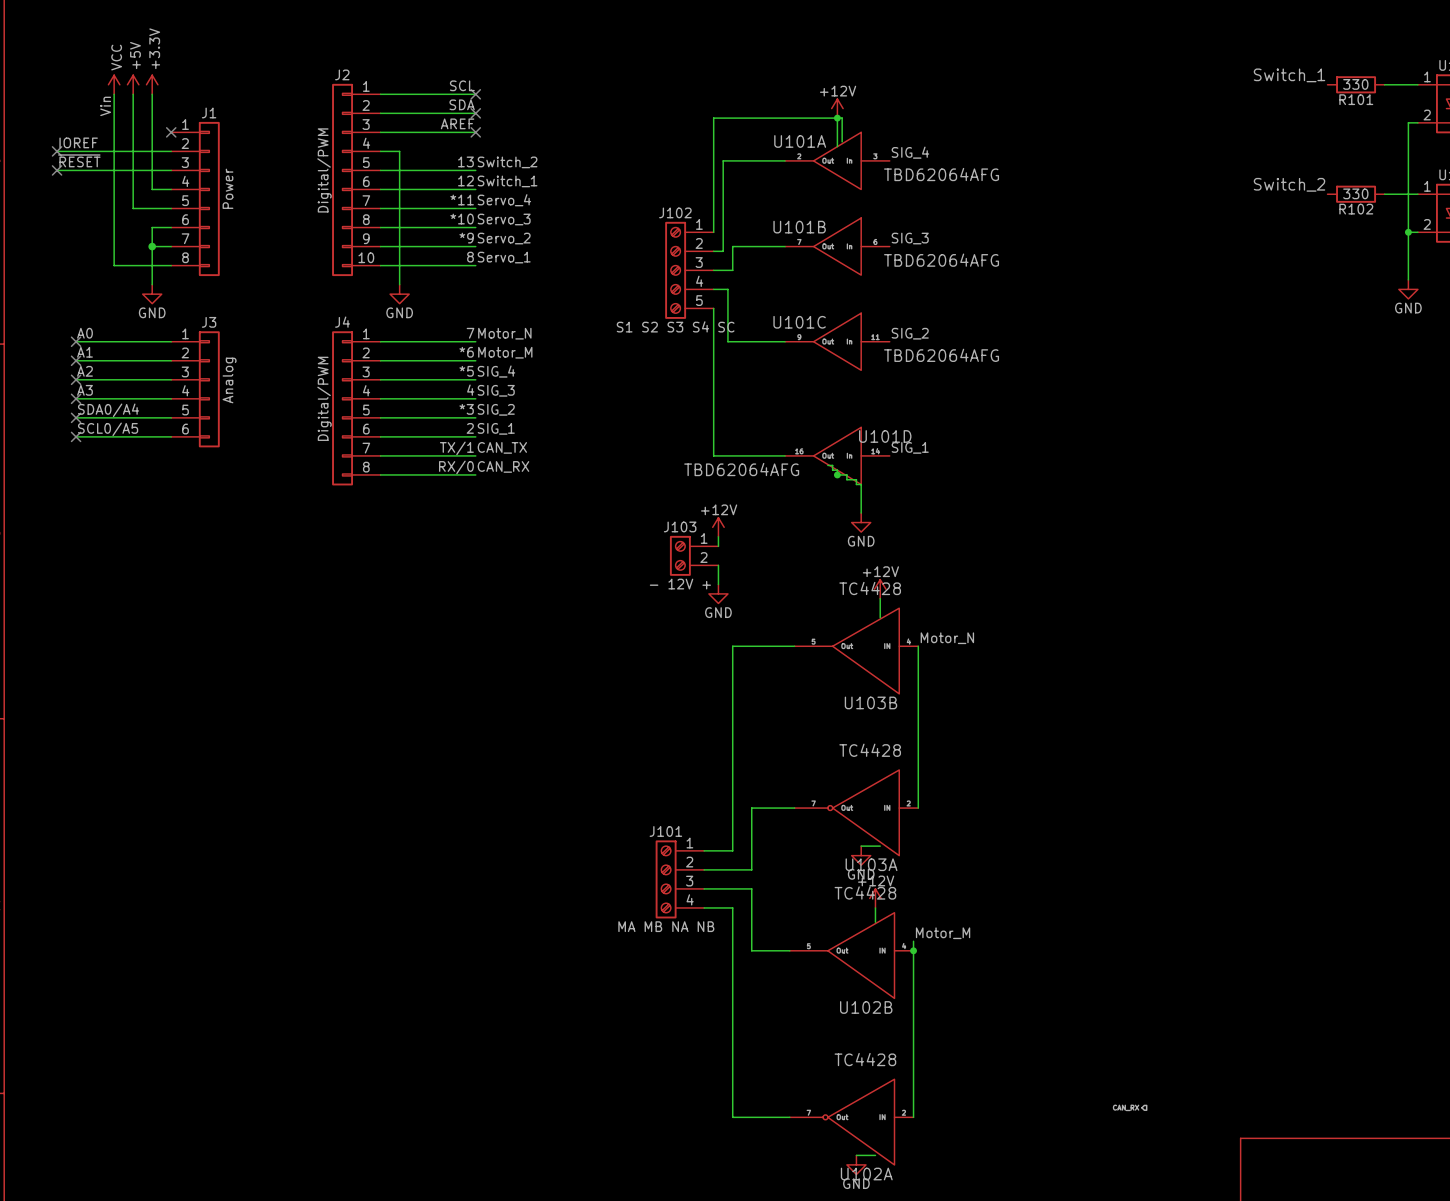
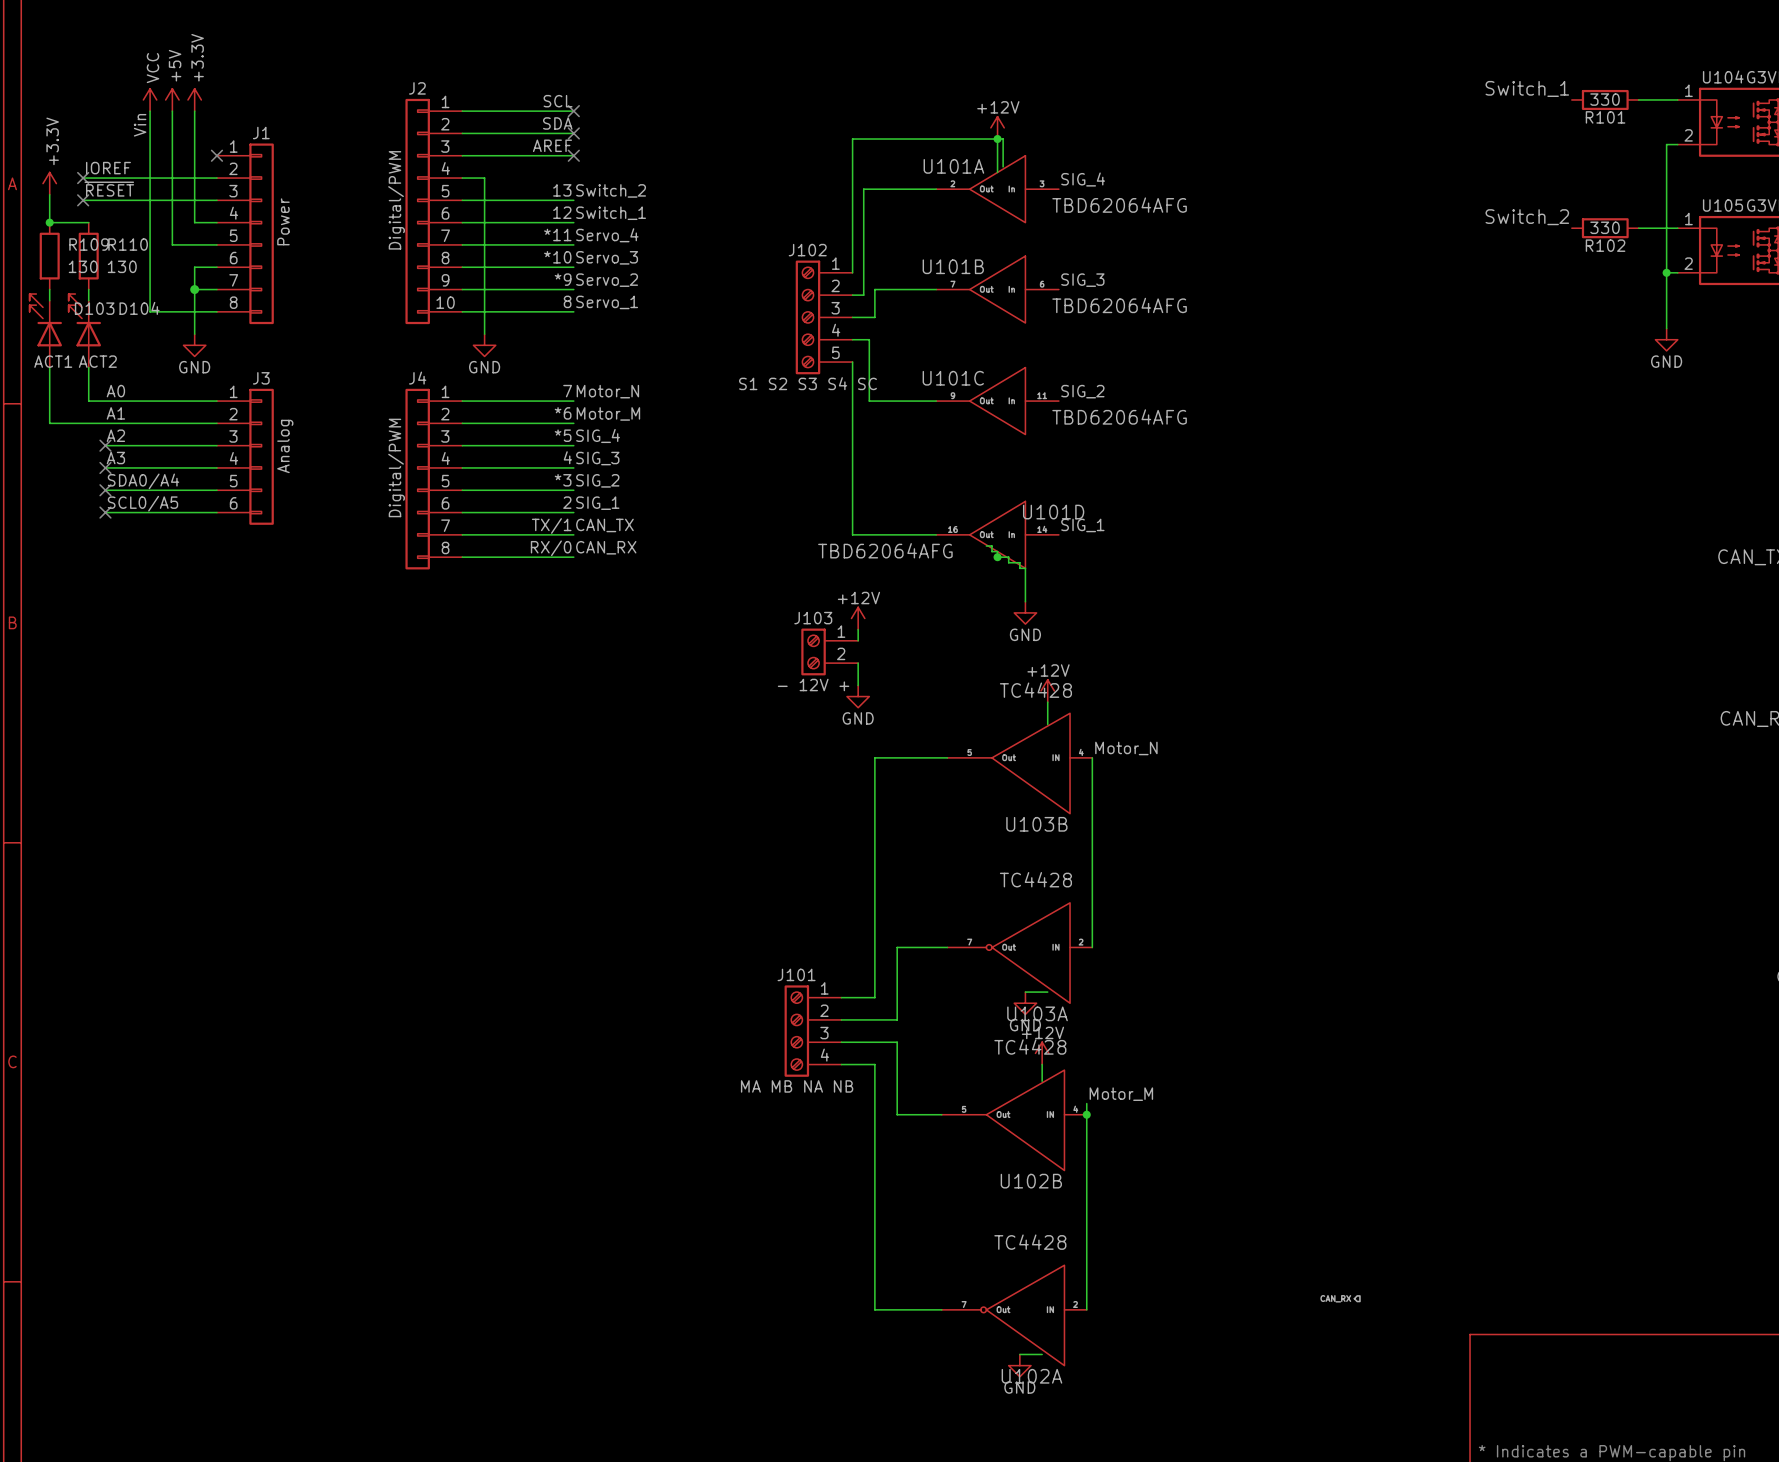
power symbol: none -> +3.3V (49, 183)
wire: none -> (49, 194) (49, 222) (88, 222)
junction: none -> (49, 222)
R109: none -> 130 (49, 256)
R110: none -> 130 (88, 256)
wire: none -> (49, 289) (49, 300)
wire: none -> (88, 289) (88, 300)
D103: none -> ACT1 (45, 330)
D104: none -> ACT2 (84, 330)
wire: none -> (49, 367) (49, 423) (105, 423)
wire: none -> (88, 367) (88, 401) (105, 401)
no-connect mark: (76, 341) -> none
no-connect mark: (76, 360) -> none

